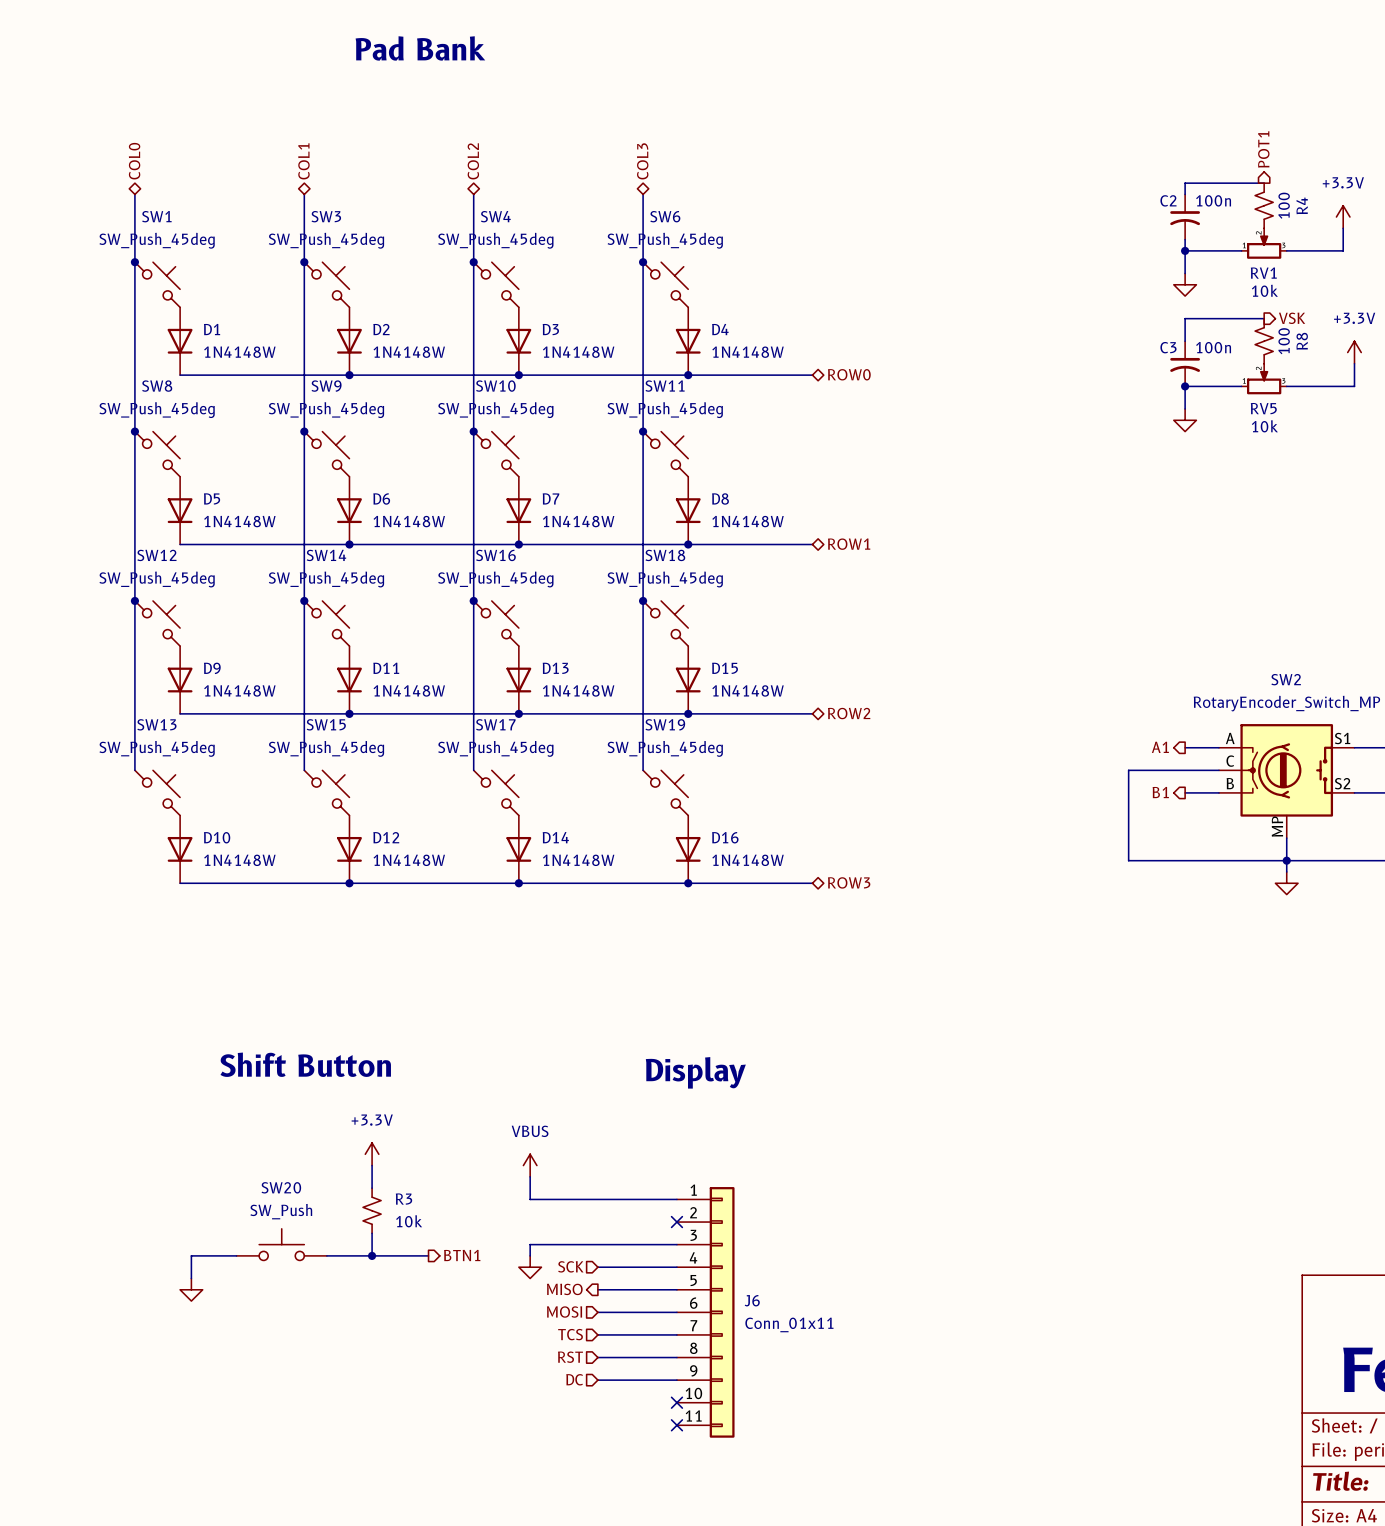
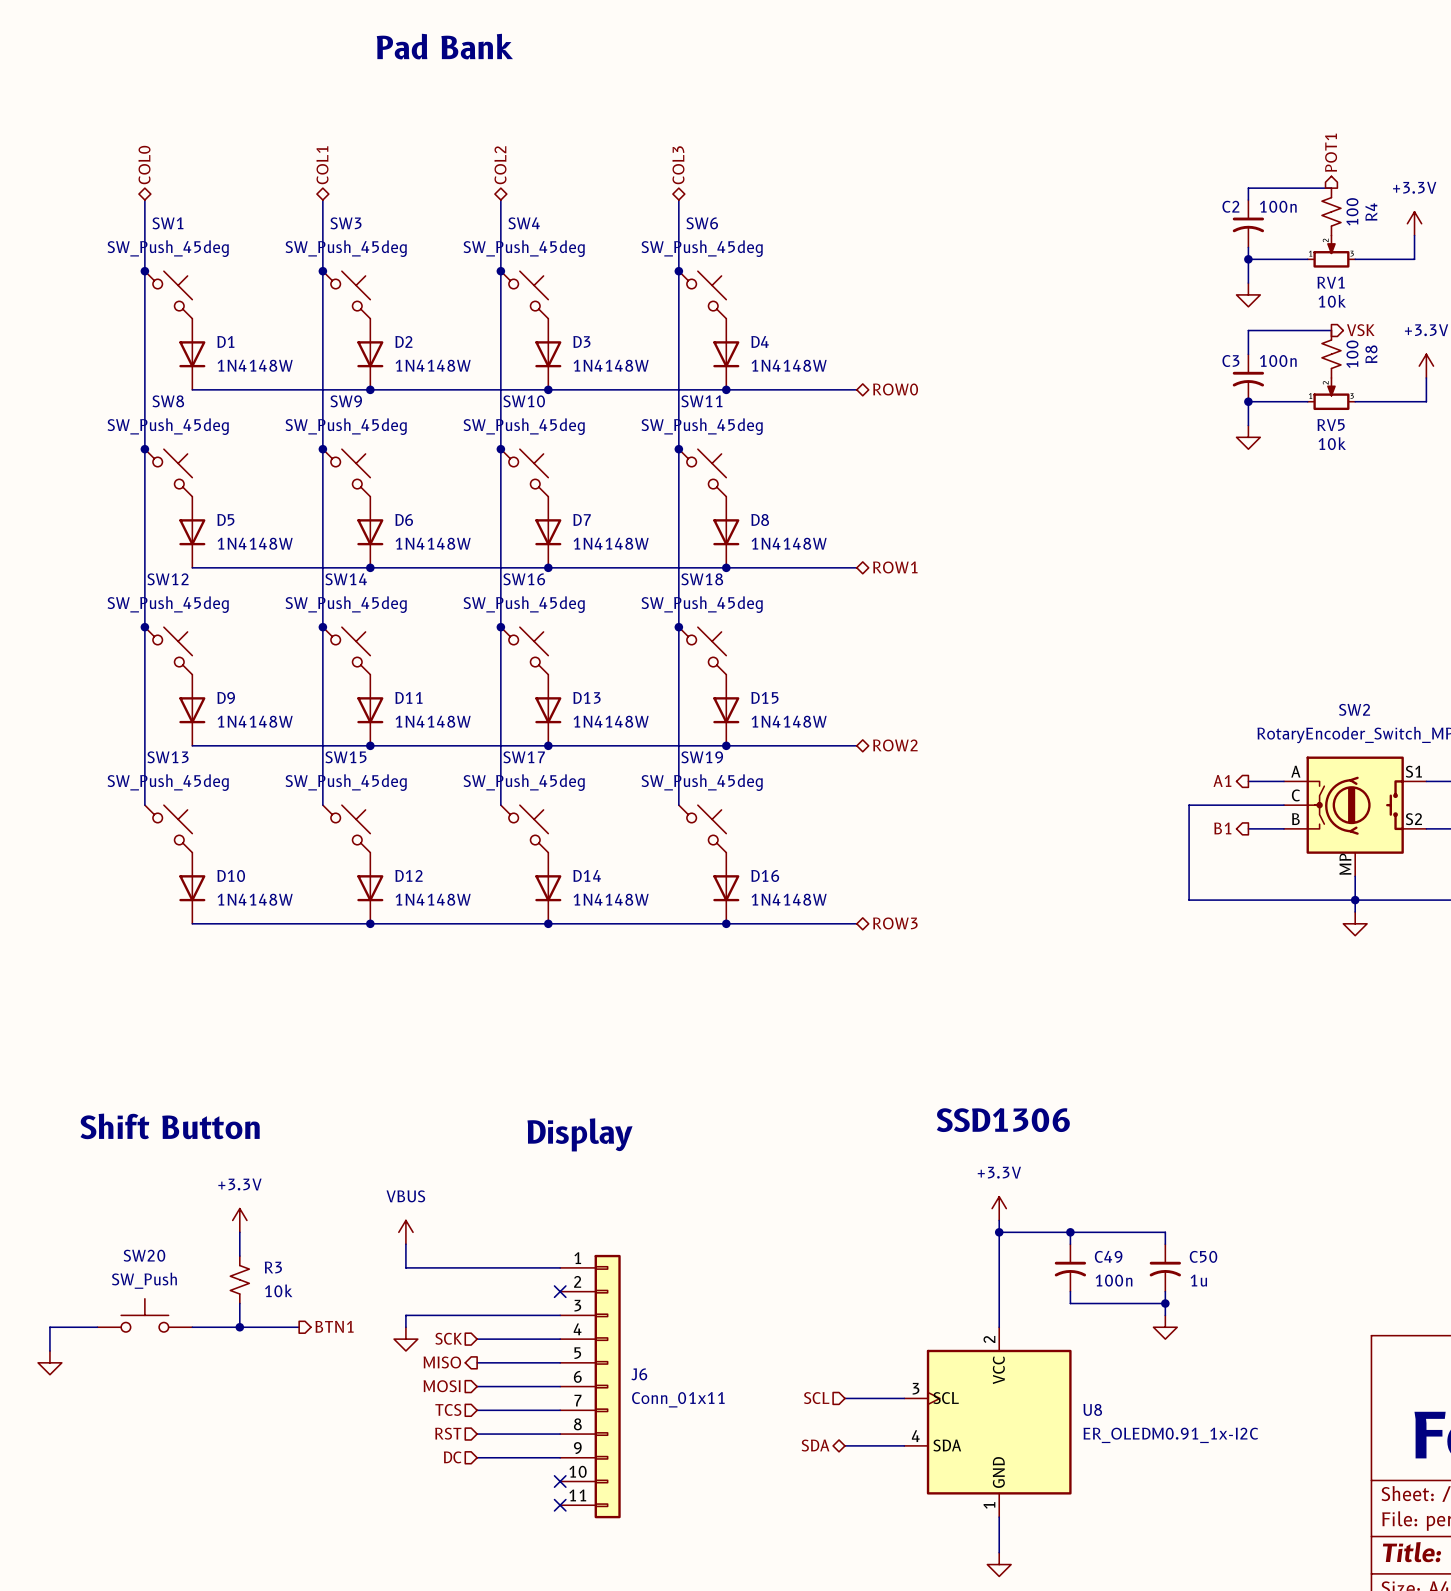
text position: Shift Button (305, 1064) -> Shift Button (170, 1126)
text: none -> SSD1306 (1003, 1120)
text position: Display (695, 1072) -> Display (580, 1134)
power symbol position: +3.3V (372, 1154) -> +3.3V (239, 1220)
power symbol: none -> +3.3V (999, 1208)
wire: (372, 1165) (372, 1188) -> (239, 1232) (239, 1256)
power symbol position: VBUS (530, 1165) -> VBUS (405, 1232)
wire: none -> (999, 1220) (999, 1327)
wire: (530, 1176) (530, 1199) (676, 1199) -> (405, 1244) (405, 1267) (560, 1267)
wire: none -> (999, 1232) (1165, 1232) (1165, 1244)
junction: none -> (999, 1232)
wire: none -> (1070, 1232) (1070, 1244)
junction: none -> (1070, 1232)
R3 position: (372, 1210) -> (239, 1279)
C49: none -> 100n (1070, 1267)
C50: none -> 1u (1165, 1267)
no-connect mark: (676, 1222) -> none
wire: (372, 1233) (372, 1255) -> (239, 1303) (239, 1327)
no-connect mark: none -> (560, 1291)
wire: none -> (1070, 1291) (1070, 1303) (1165, 1303)
wire: none -> (1165, 1291) (1165, 1315)
SW20 position: (281, 1244) -> (144, 1315)
wire: (676, 1244) (530, 1244) (530, 1255) -> (453, 1315) (560, 1315)
junction: none -> (1165, 1303)
wire: (236, 1255) (191, 1255) (191, 1278) -> (97, 1327) (49, 1327) (49, 1350)
wire: (326, 1255) (383, 1255) -> (405, 1327) (405, 1315)
junction: (372, 1255) -> none
hierarchical label position: BTN1 (462, 1255) -> BTN1 (334, 1326)
hierarchical label position: SCK (570, 1266) -> SCK (448, 1338)
wire: none -> (192, 1327) (299, 1327)
junction: none -> (239, 1327)
power symbol: (530, 1267) -> none
wire: (597, 1267) (676, 1267) -> (477, 1339) (560, 1339)
power symbol: none -> (1165, 1327)
power symbol: none -> (405, 1339)
power symbol: (191, 1289) -> none
hierarchical label position: MISO (564, 1289) -> MISO (442, 1362)
wire: (597, 1289) (676, 1289) -> (477, 1362) (560, 1362)
power symbol: none -> (49, 1362)
hierarchical label position: MOSI (564, 1312) -> MOSI (442, 1386)
wire: (597, 1312) (676, 1312) -> (477, 1386) (560, 1386)
J6 position: (705, 1312) -> (590, 1386)
hierarchical label position: TCS (570, 1334) -> TCS (448, 1409)
wire: (597, 1334) (676, 1334) -> (477, 1410) (560, 1410)
hierarchical label: none -> SCL (816, 1398)
wire: none -> (844, 1398) (904, 1398)
hierarchical label position: RST (570, 1357) -> RST (448, 1433)
wire: (597, 1357) (676, 1357) -> (477, 1434) (560, 1434)
U8: none -> ER_OLEDM0.91_1x-I2C (987, 1422)
hierarchical label position: DC (574, 1379) -> DC (452, 1457)
hierarchical label: none -> SDA (815, 1445)
wire: (597, 1380) (676, 1380) -> (477, 1457) (560, 1457)
wire: none -> (844, 1445) (904, 1445)
no-connect mark: (676, 1402) -> none
no-connect mark: none -> (560, 1481)
no-connect mark: (676, 1425) -> none
no-connect mark: none -> (560, 1505)
wire: none -> (999, 1517) (999, 1552)
power symbol: none -> (999, 1564)

